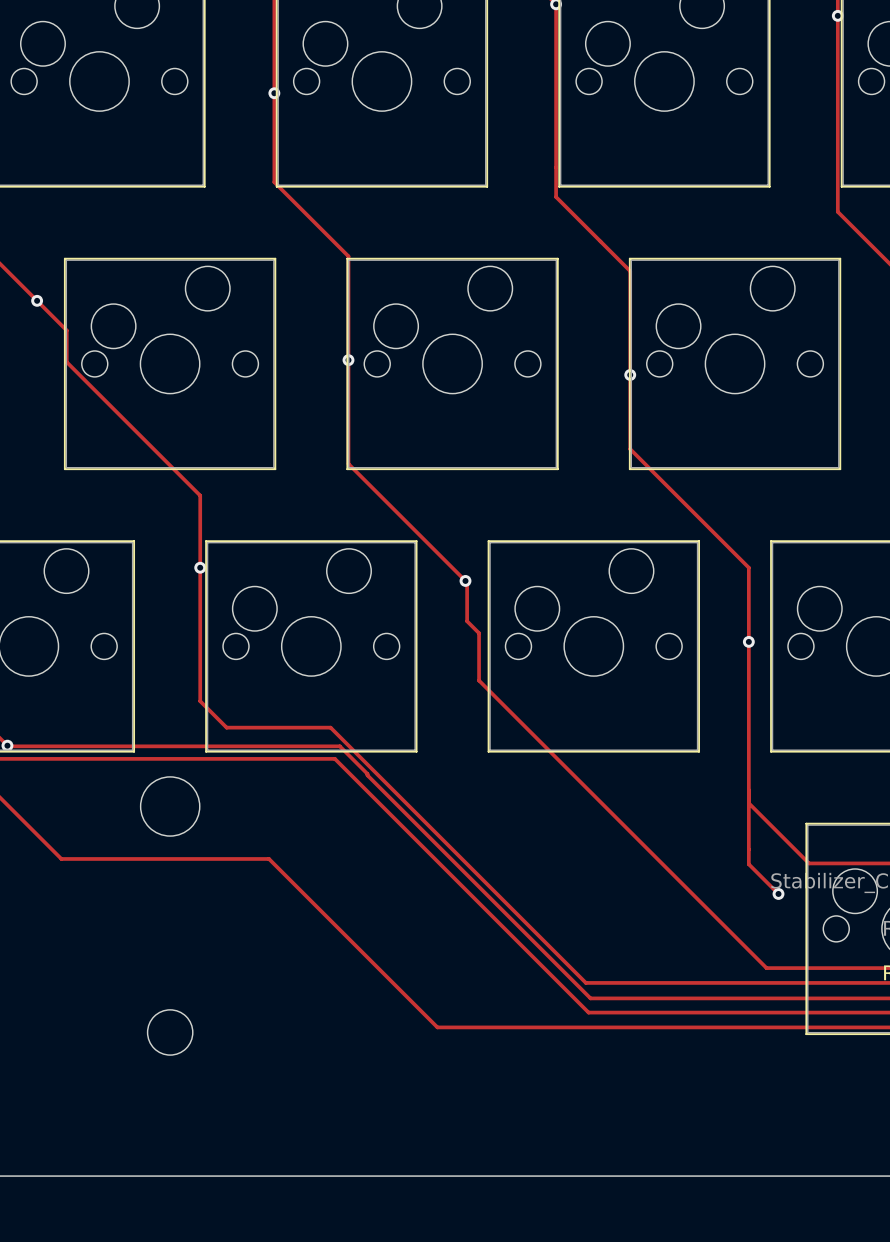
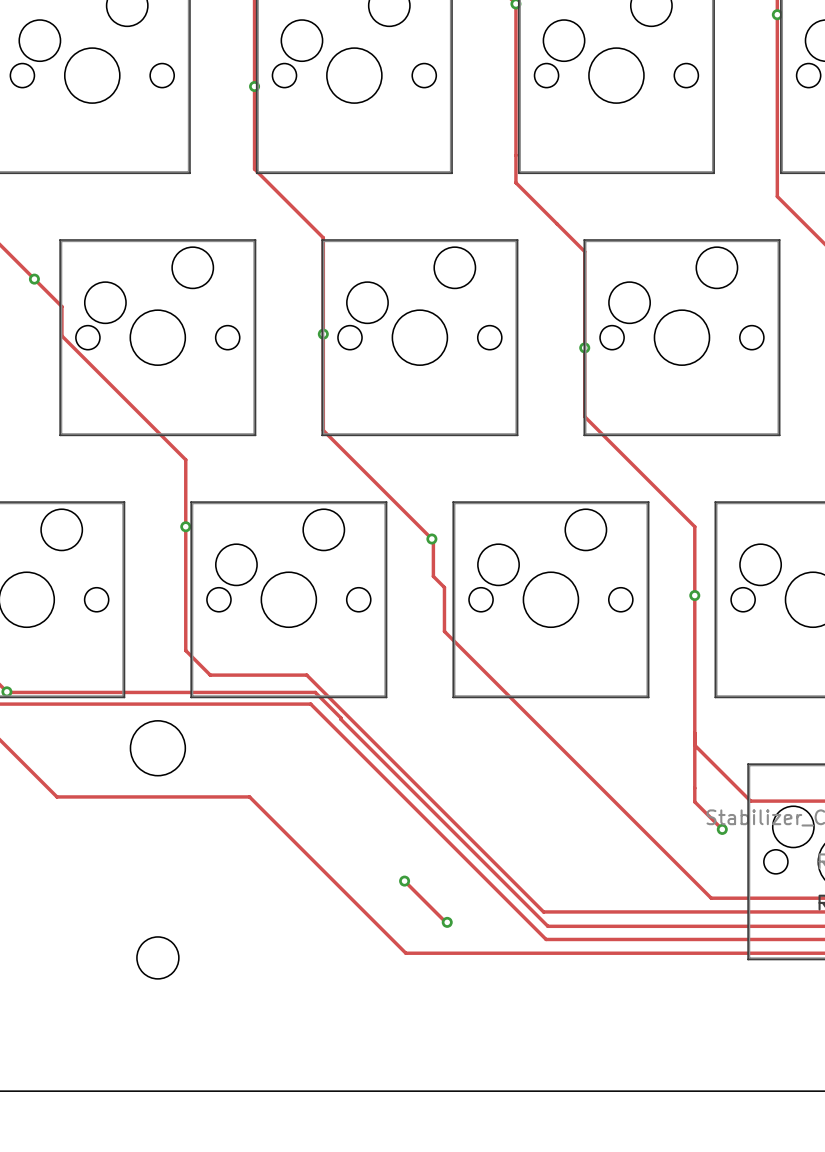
track: none -> (404, 881) (447, 922)
via: none -> (404, 881)
via: none -> (447, 922)

